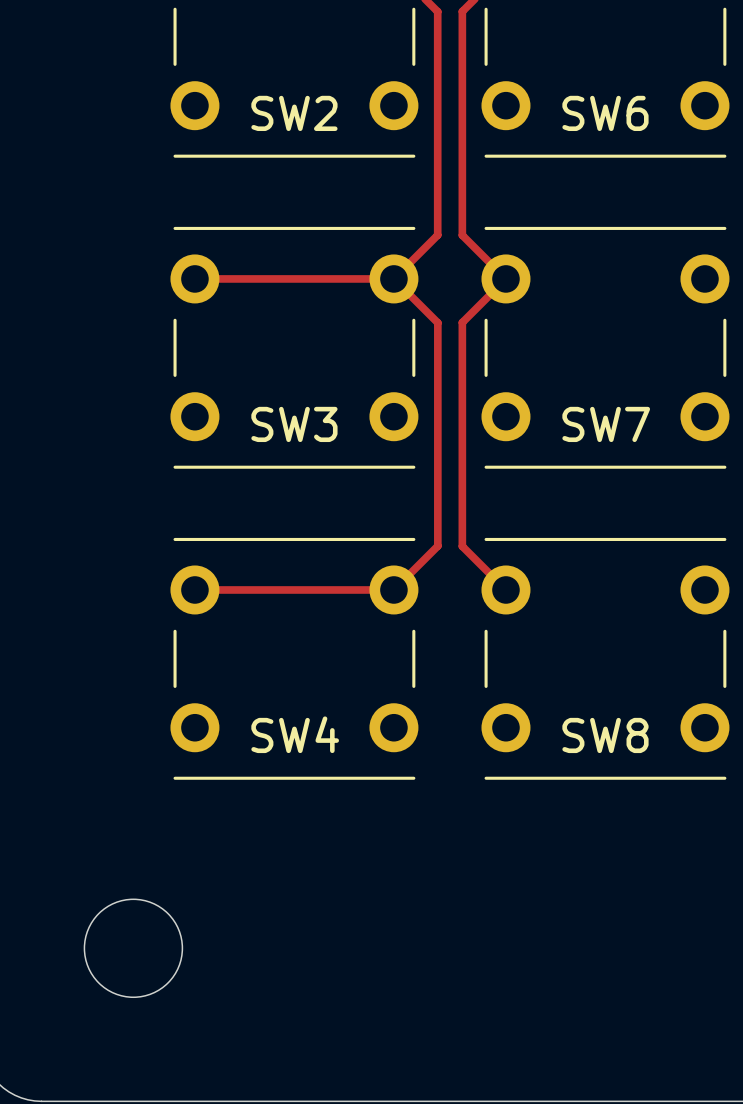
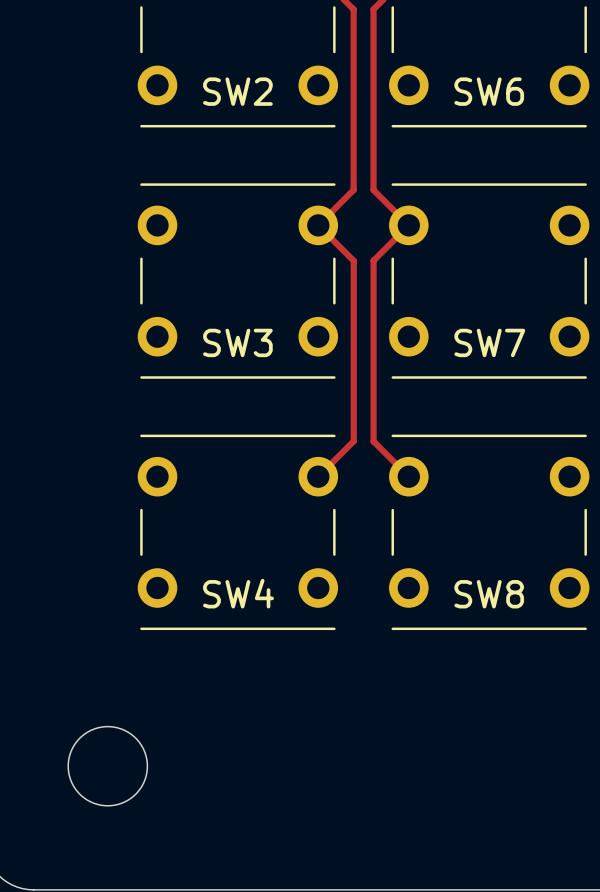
track: (194, 278) (393, 278) -> none
track: (194, 589) (393, 589) -> none

